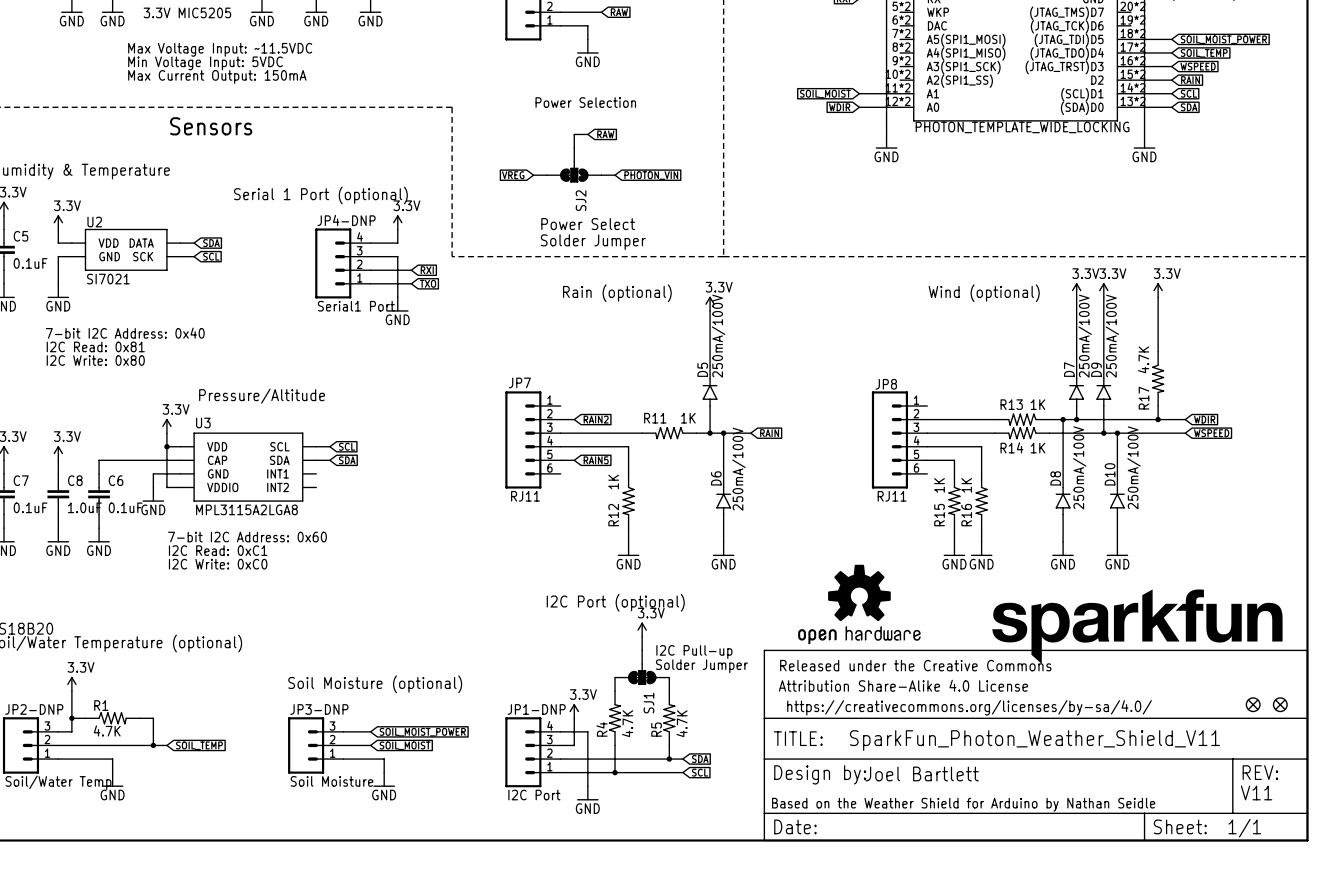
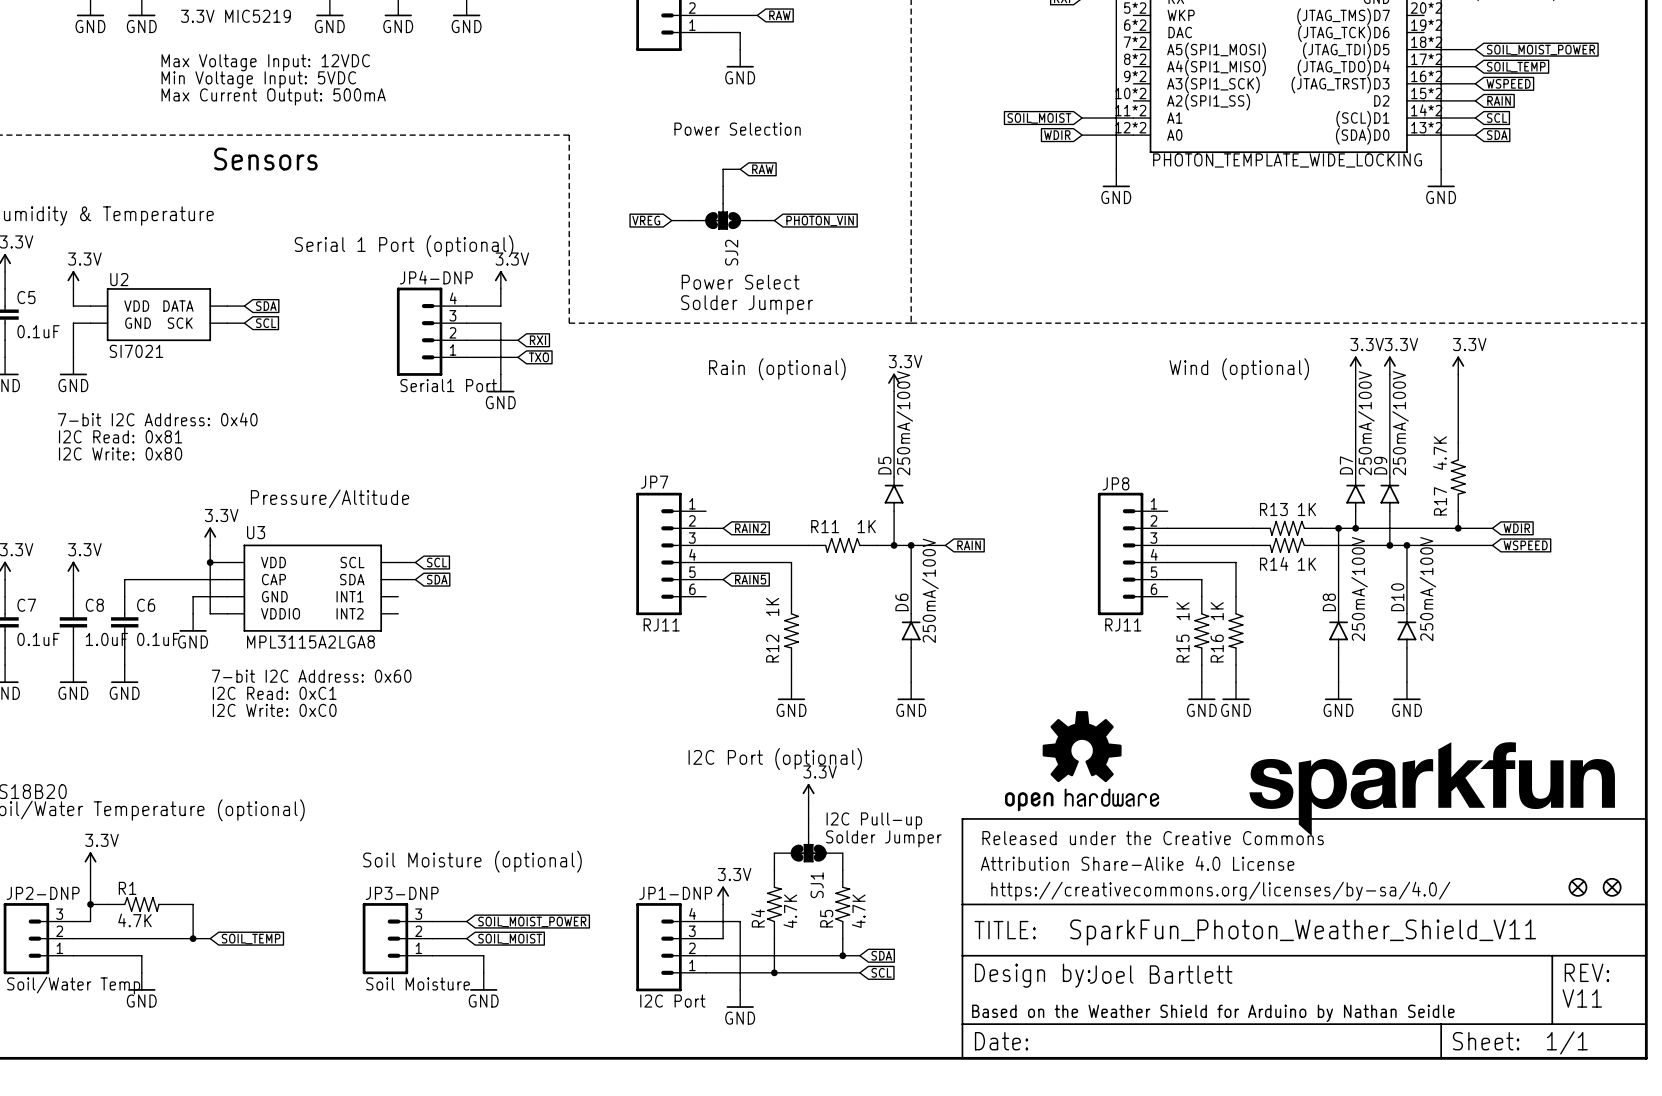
part value: 3.3V MIC5205 (187, 12) -> 3.3V MIC5219 (235, 16)
text: Max Voltage Input: ~11.5VDC (220, 49) -> Max Voltage Input: 12VDC (265, 62)
text: Max Current Output: 150mA (217, 76) -> Max Current Output: 500mA (273, 96)

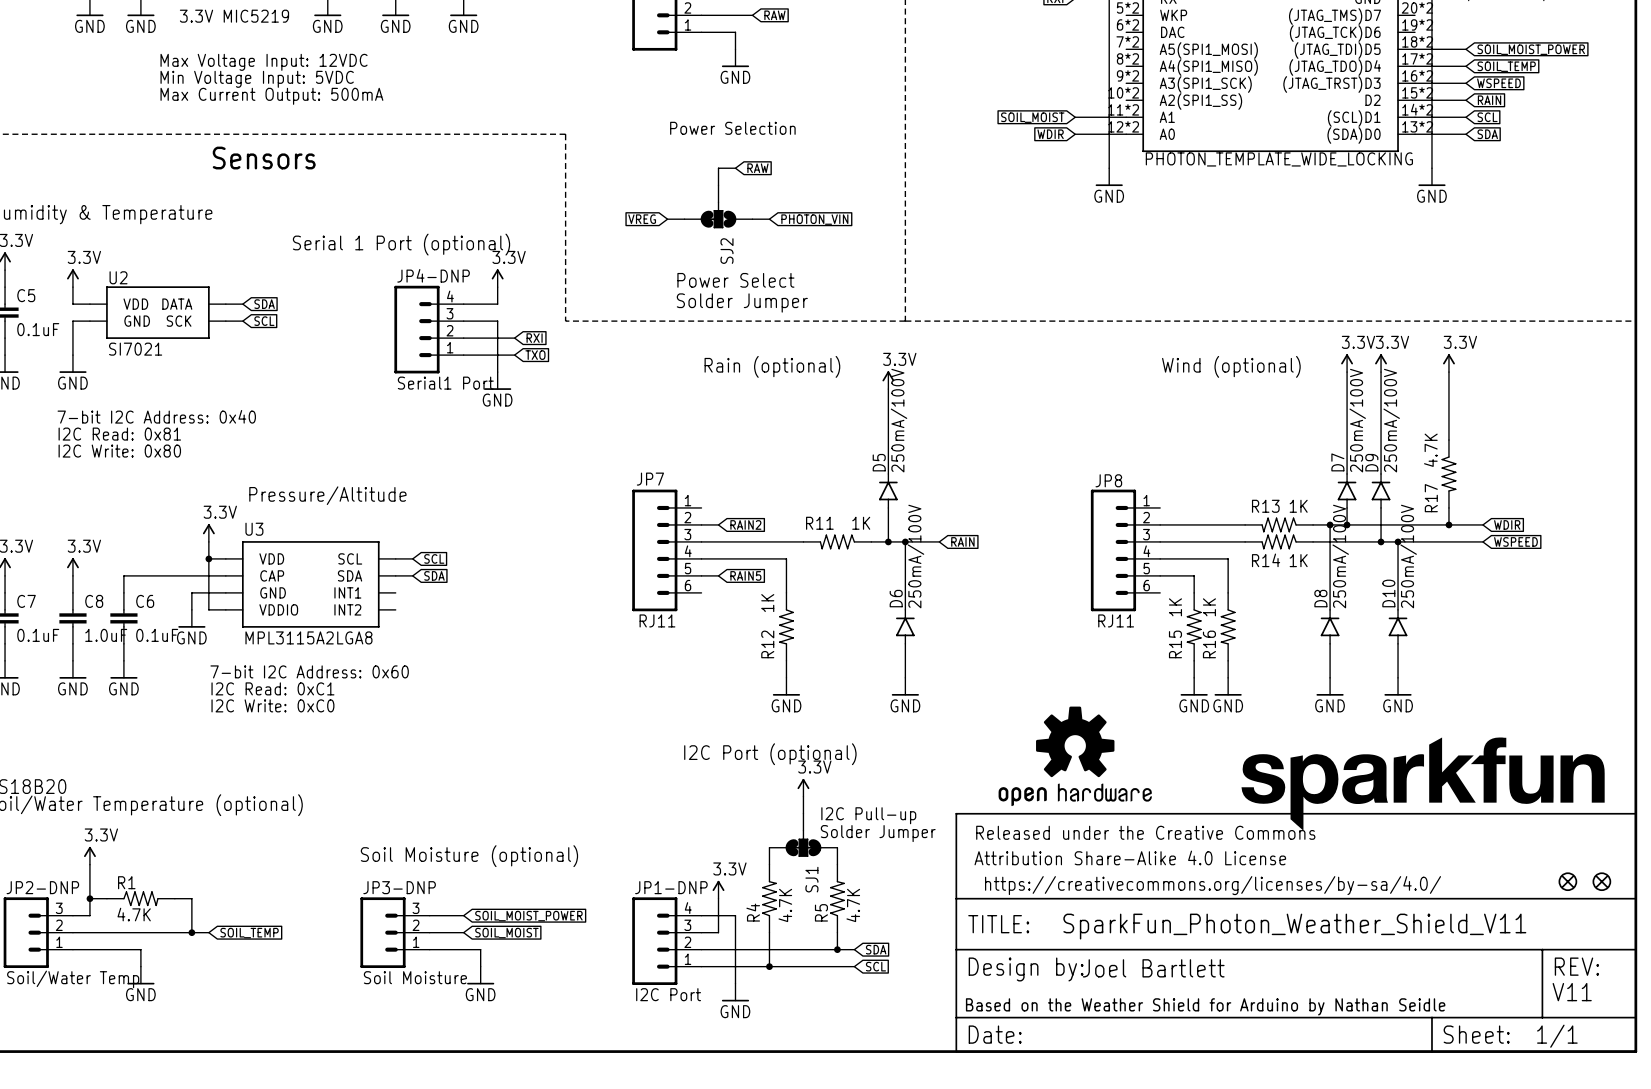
D8 value position: 250mA/100V (1359, 589) -> 250mA/100V (1340, 556)
D10 value position: 250mA/100V (1427, 589) -> 250mA/100V (1408, 556)
D6 value position: 250mA/100V (930, 590) -> 250mA/100V (916, 556)

